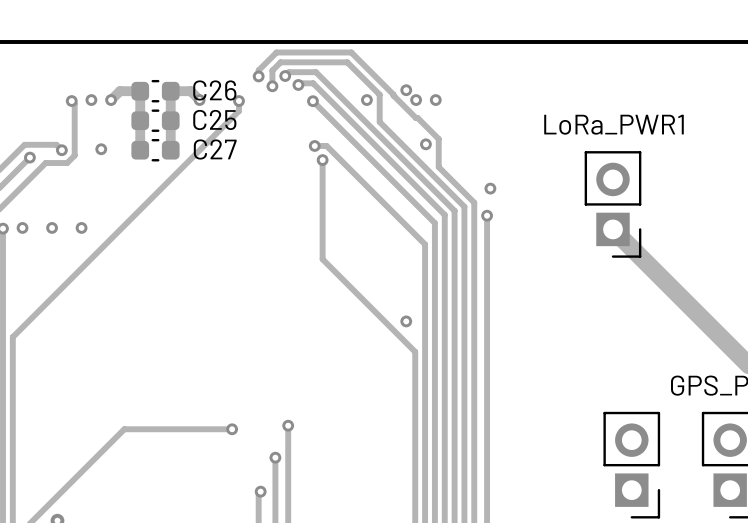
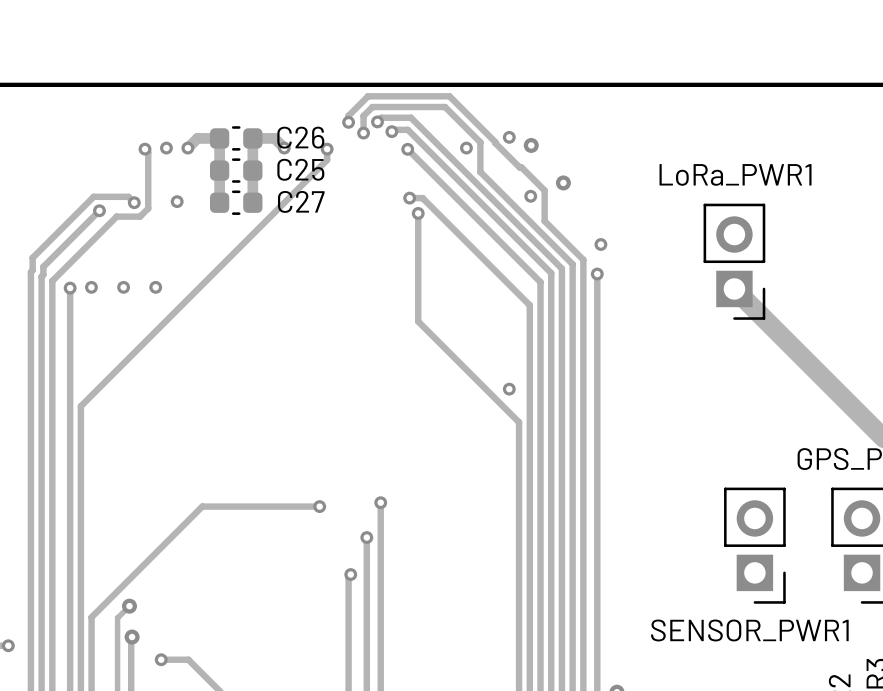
via: none -> (531, 145)
via: (416, 100) -> none
via: (435, 100) -> none
via: none -> (563, 182)

